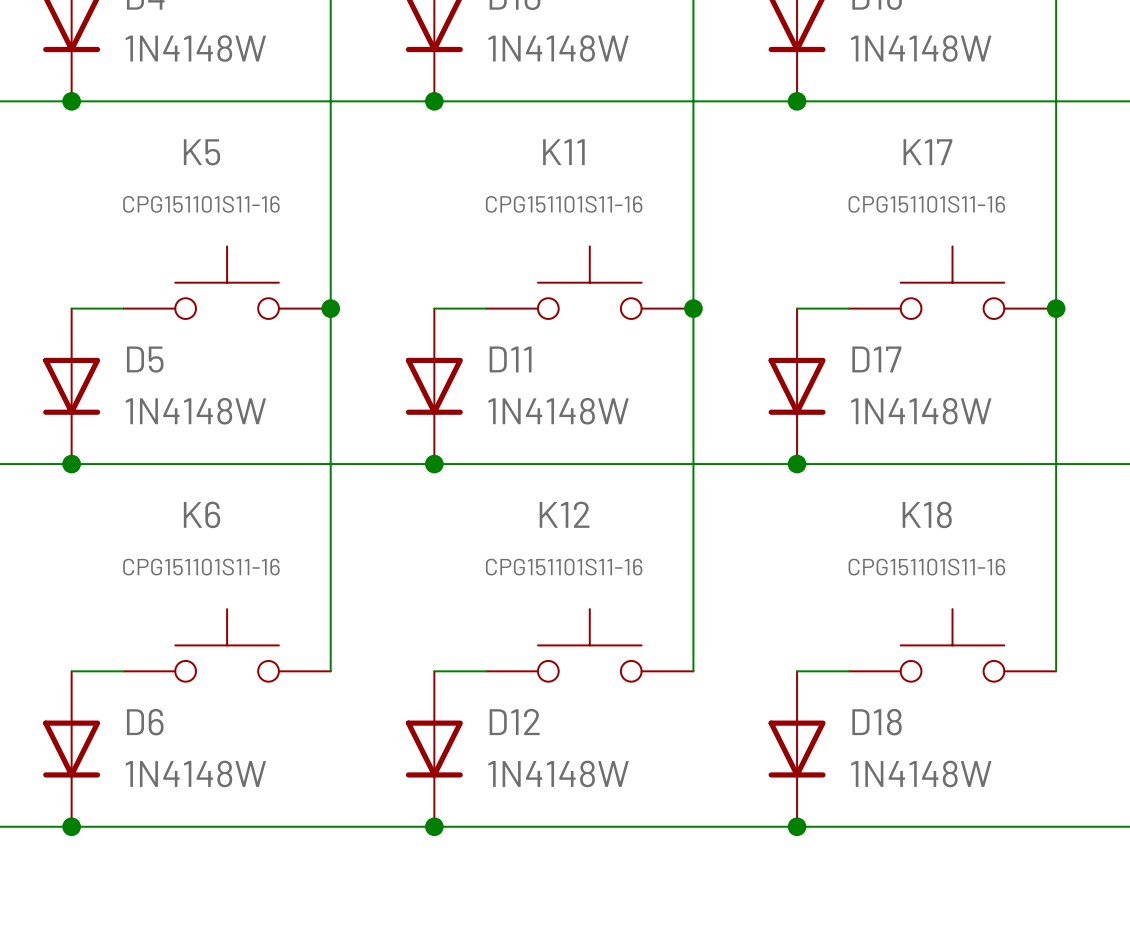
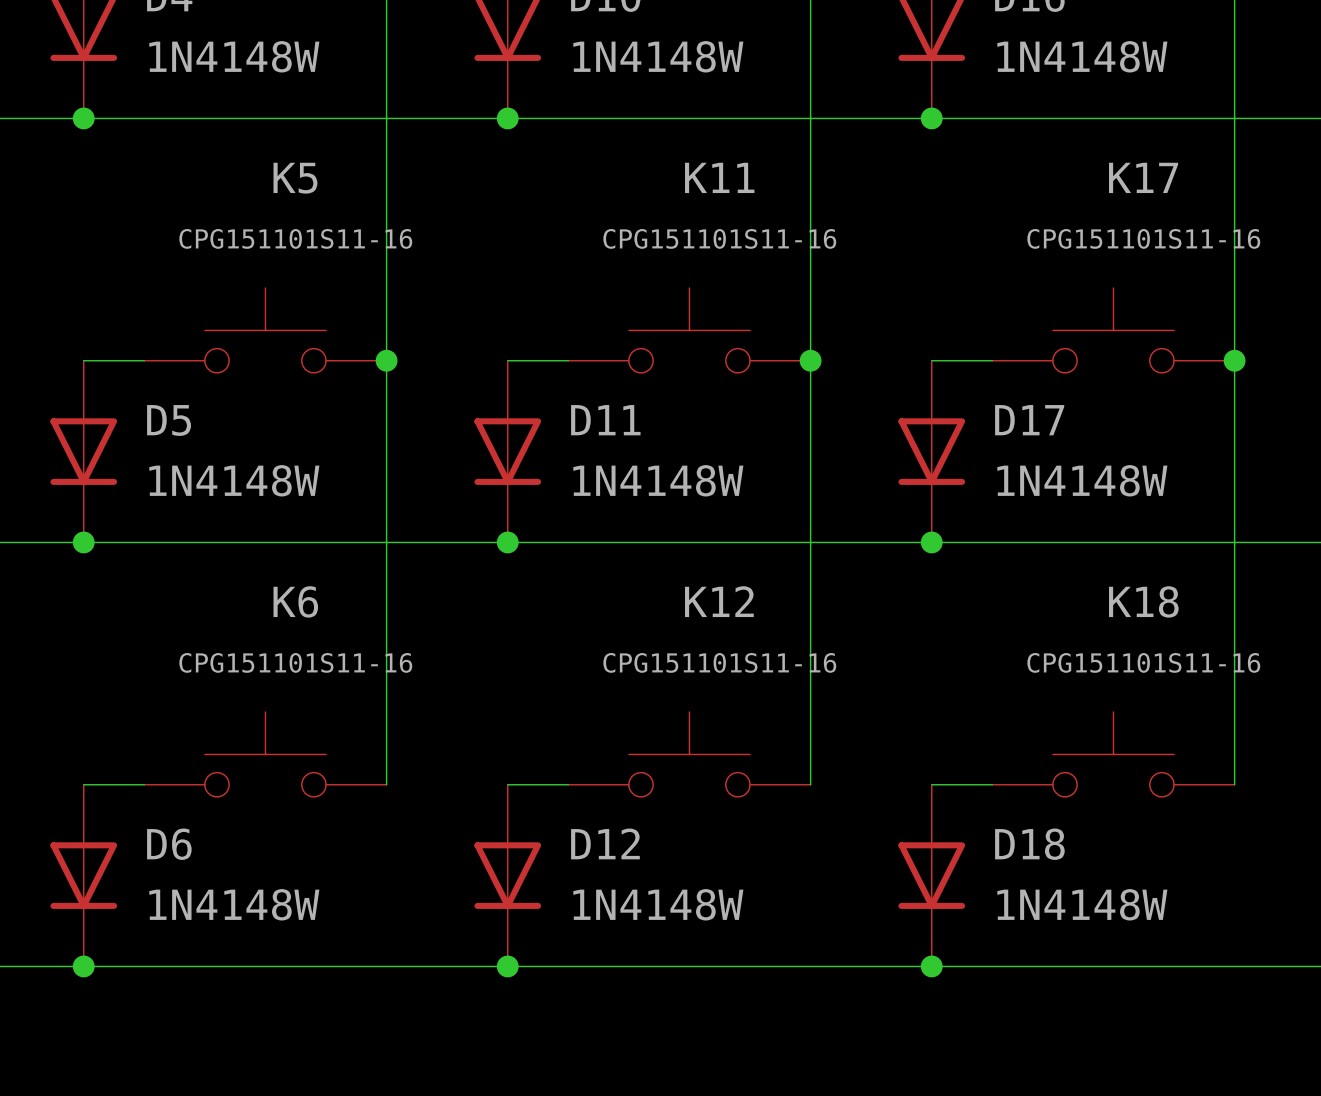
K5 name position: K5 (201, 152) -> K5 (295, 178)
K11 name position: K11 (563, 152) -> K11 (719, 177)
K17 name position: K17 (927, 152) -> K17 (1143, 177)
K5 value position: CPG151101S11-16 (201, 204) -> CPG151101S11-16 (295, 238)
K11 value position: CPG151101S11-16 (564, 204) -> CPG151101S11-16 (719, 238)
K17 value position: CPG151101S11-16 (926, 204) -> CPG151101S11-16 (1143, 238)
K6 name position: K6 (201, 514) -> K6 (295, 601)
K12 name position: K12 (564, 514) -> K12 (719, 601)
K18 name position: K18 (927, 514) -> K18 (1143, 601)
K6 value position: CPG151101S11-16 (201, 567) -> CPG151101S11-16 (295, 662)
K12 value position: CPG151101S11-16 (564, 567) -> CPG151101S11-16 (719, 662)
K18 value position: CPG151101S11-16 (926, 567) -> CPG151101S11-16 (1143, 662)

